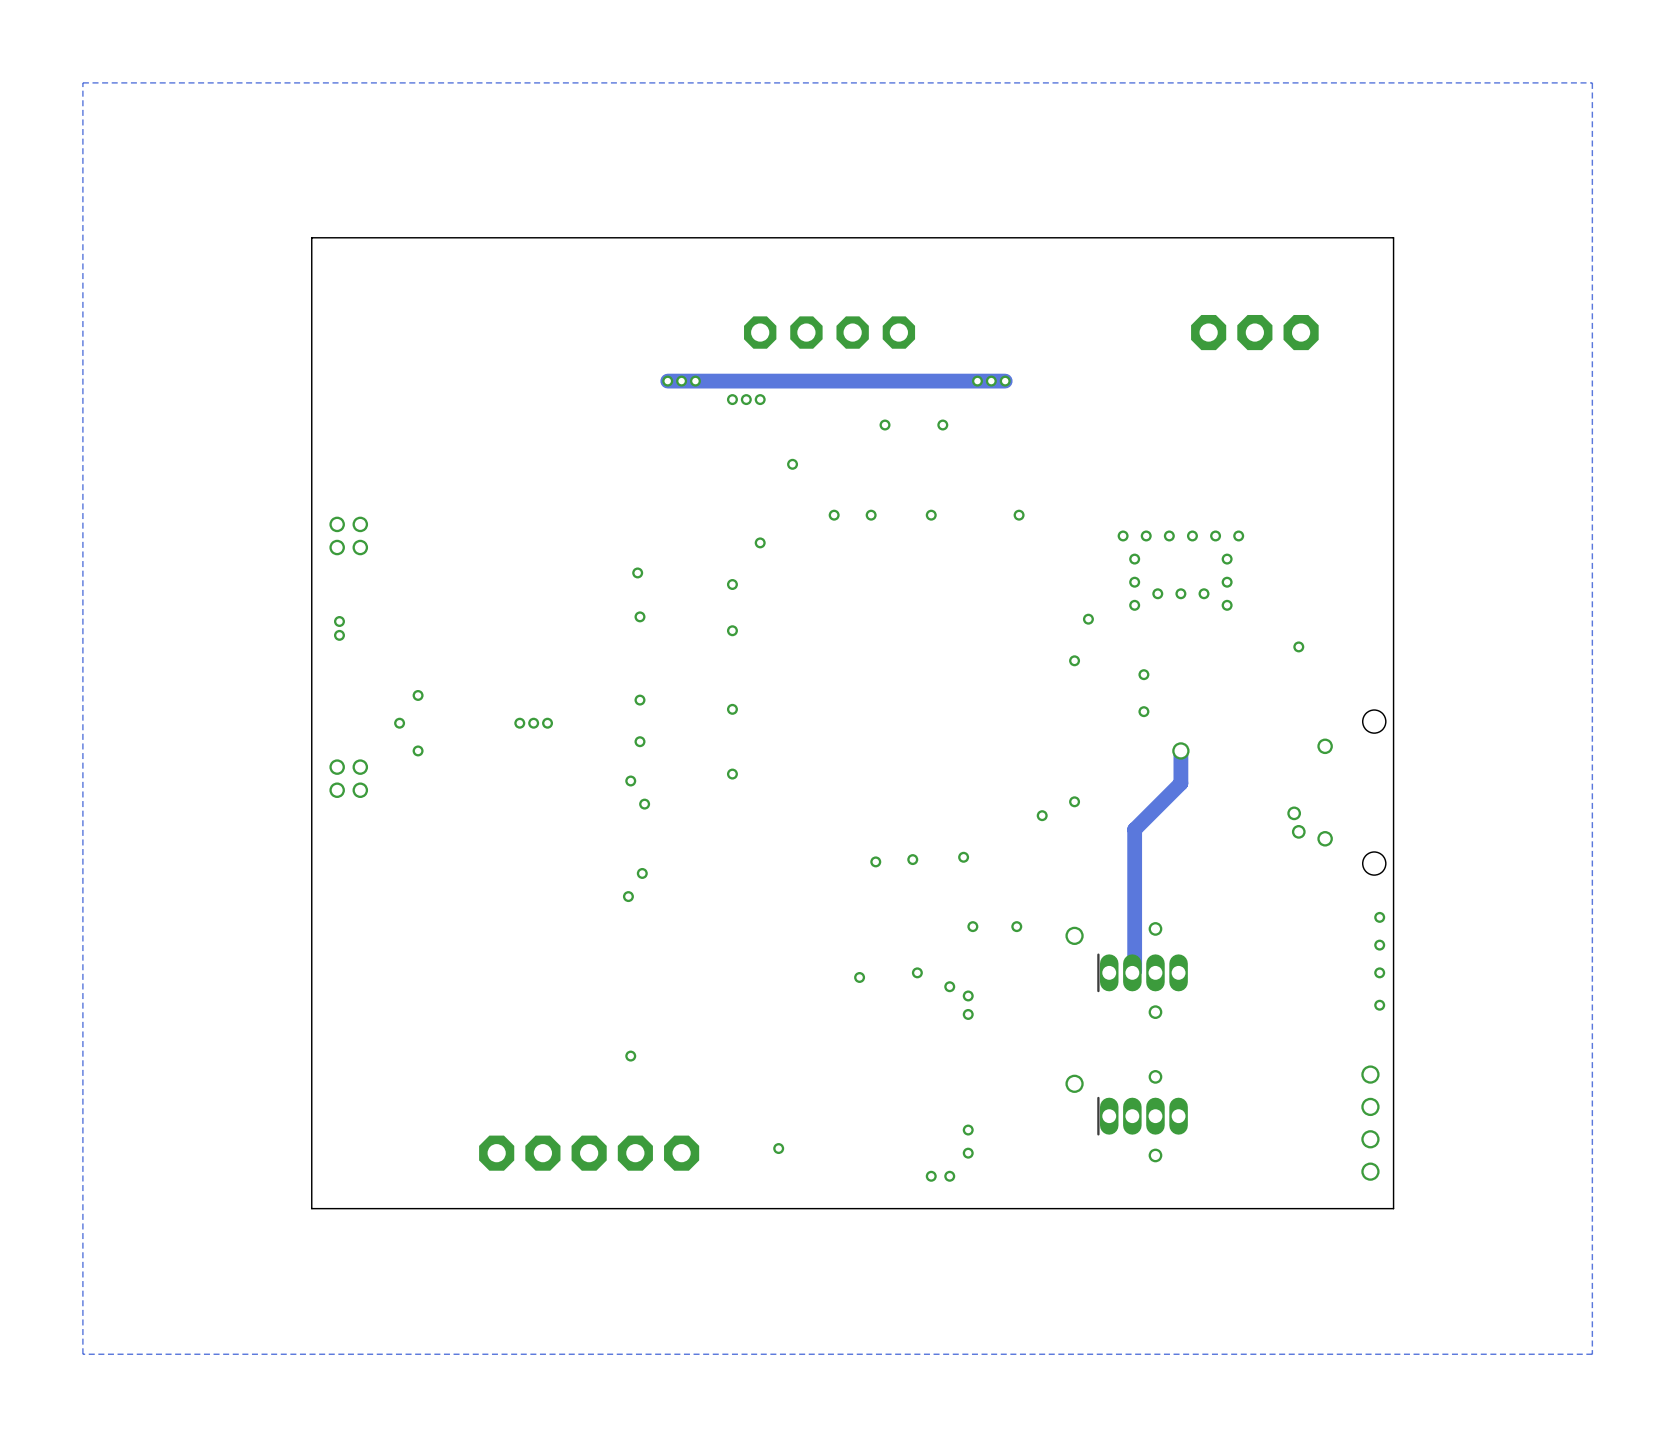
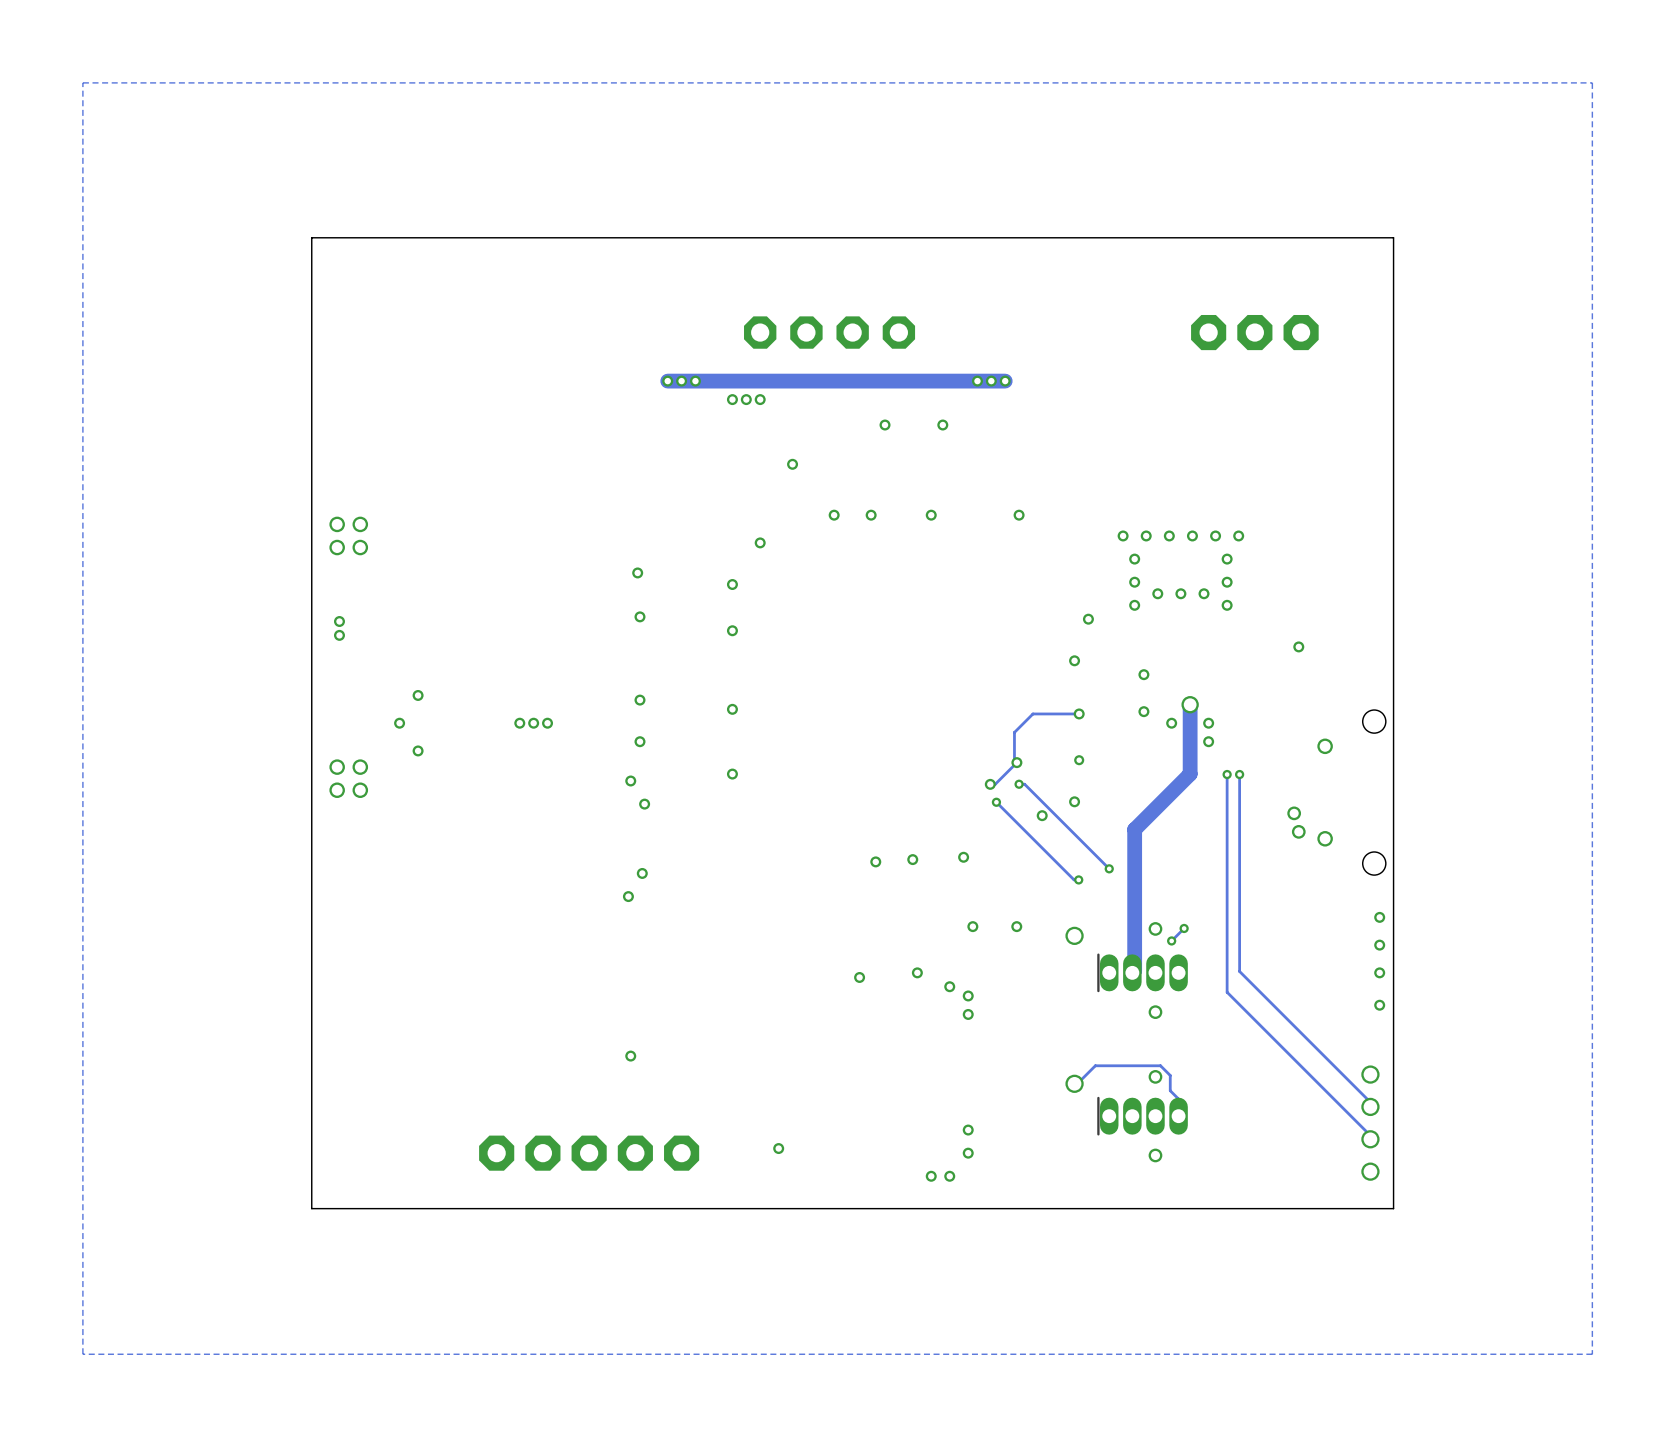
track: none -> (1079, 713) (1032, 713) (1014, 732) (1014, 760) (1016, 762) (995, 784) (990, 784)
via: none -> (1079, 713)
via: none -> (1171, 723)
via: none -> (1208, 723)
via: none -> (1208, 741)
track: (1180, 750) (1180, 783) -> (1190, 704) (1190, 774) (1180, 783)
via position: (1180, 750) -> (1190, 704)
via: none -> (1079, 760)
via: none -> (1016, 762)
track: none -> (1227, 774) (1227, 992) (1369, 1135) (1370, 1139)
via: none -> (1227, 774)
track: none -> (1239, 774) (1239, 971) (1369, 1101) (1370, 1106)
via: none -> (1239, 774)
via: none -> (990, 784)
track: none -> (1019, 784) (1024, 784) (1109, 868)
via: none -> (1019, 784)
track: none -> (996, 802) (1074, 879) (1078, 879)
via: none -> (996, 802)
via: none -> (1109, 868)
via: none -> (1078, 879)
track: none -> (1184, 928) (1171, 940)
via: none -> (1184, 928)
via: none -> (1171, 940)
track: none -> (1074, 1083) (1077, 1083) (1095, 1065) (1160, 1065) (1170, 1075) (1170, 1090) (1178, 1099) (1178, 1116)

